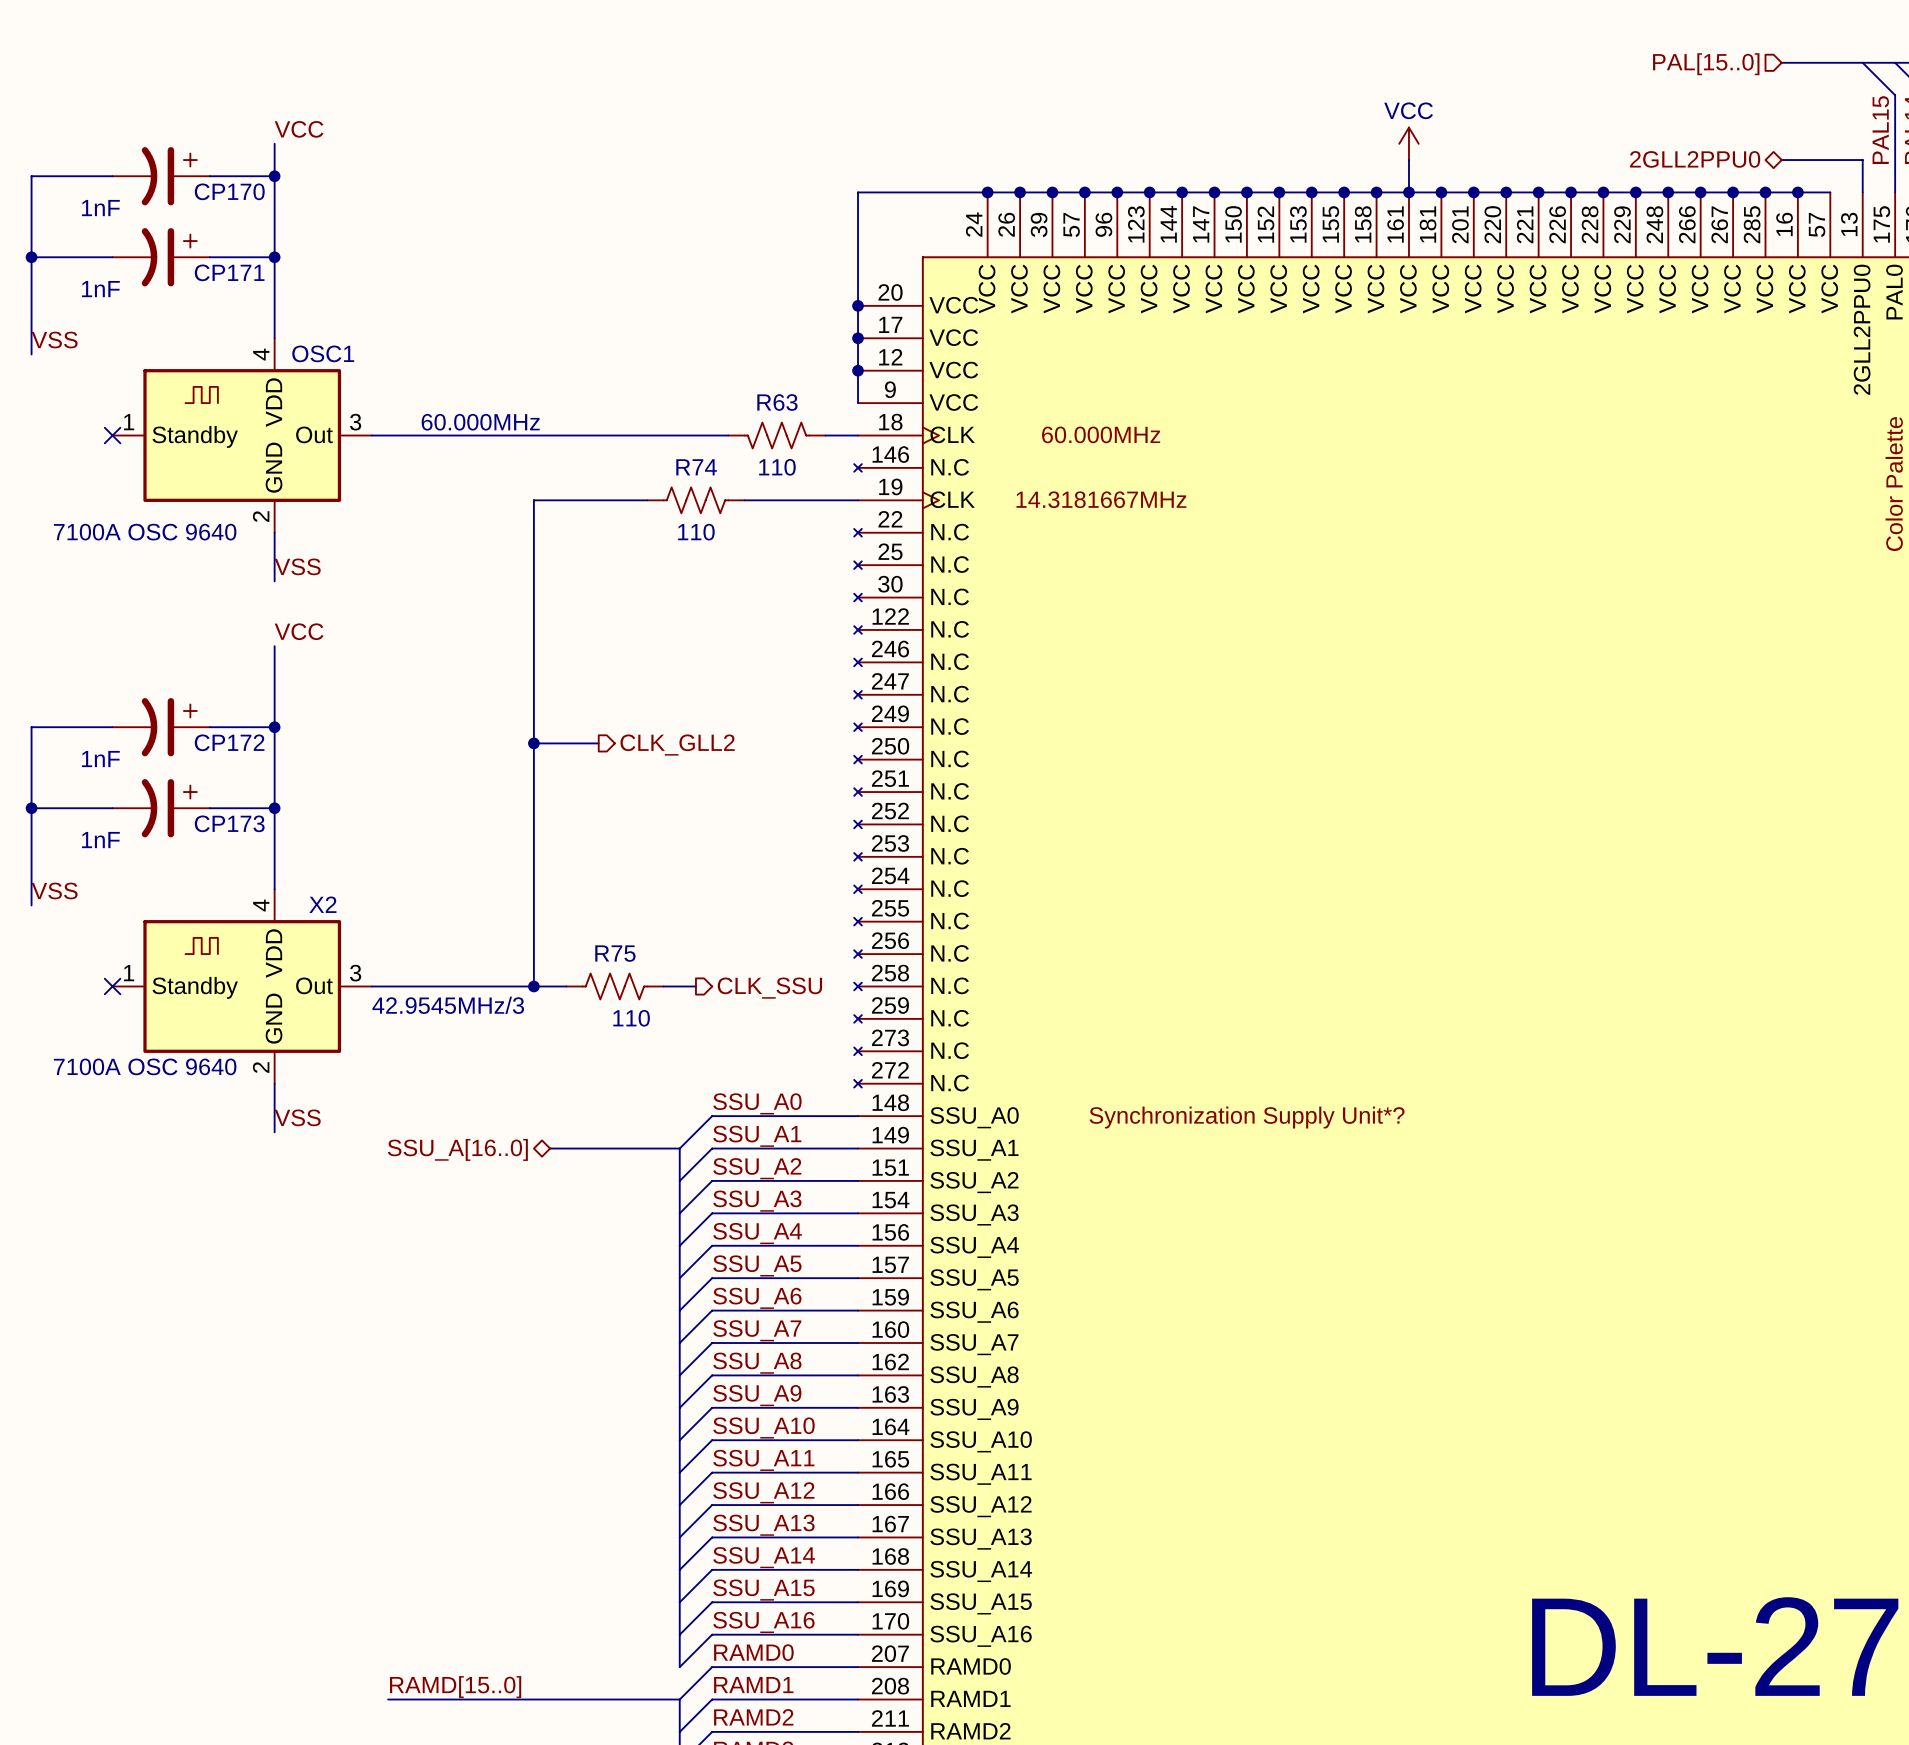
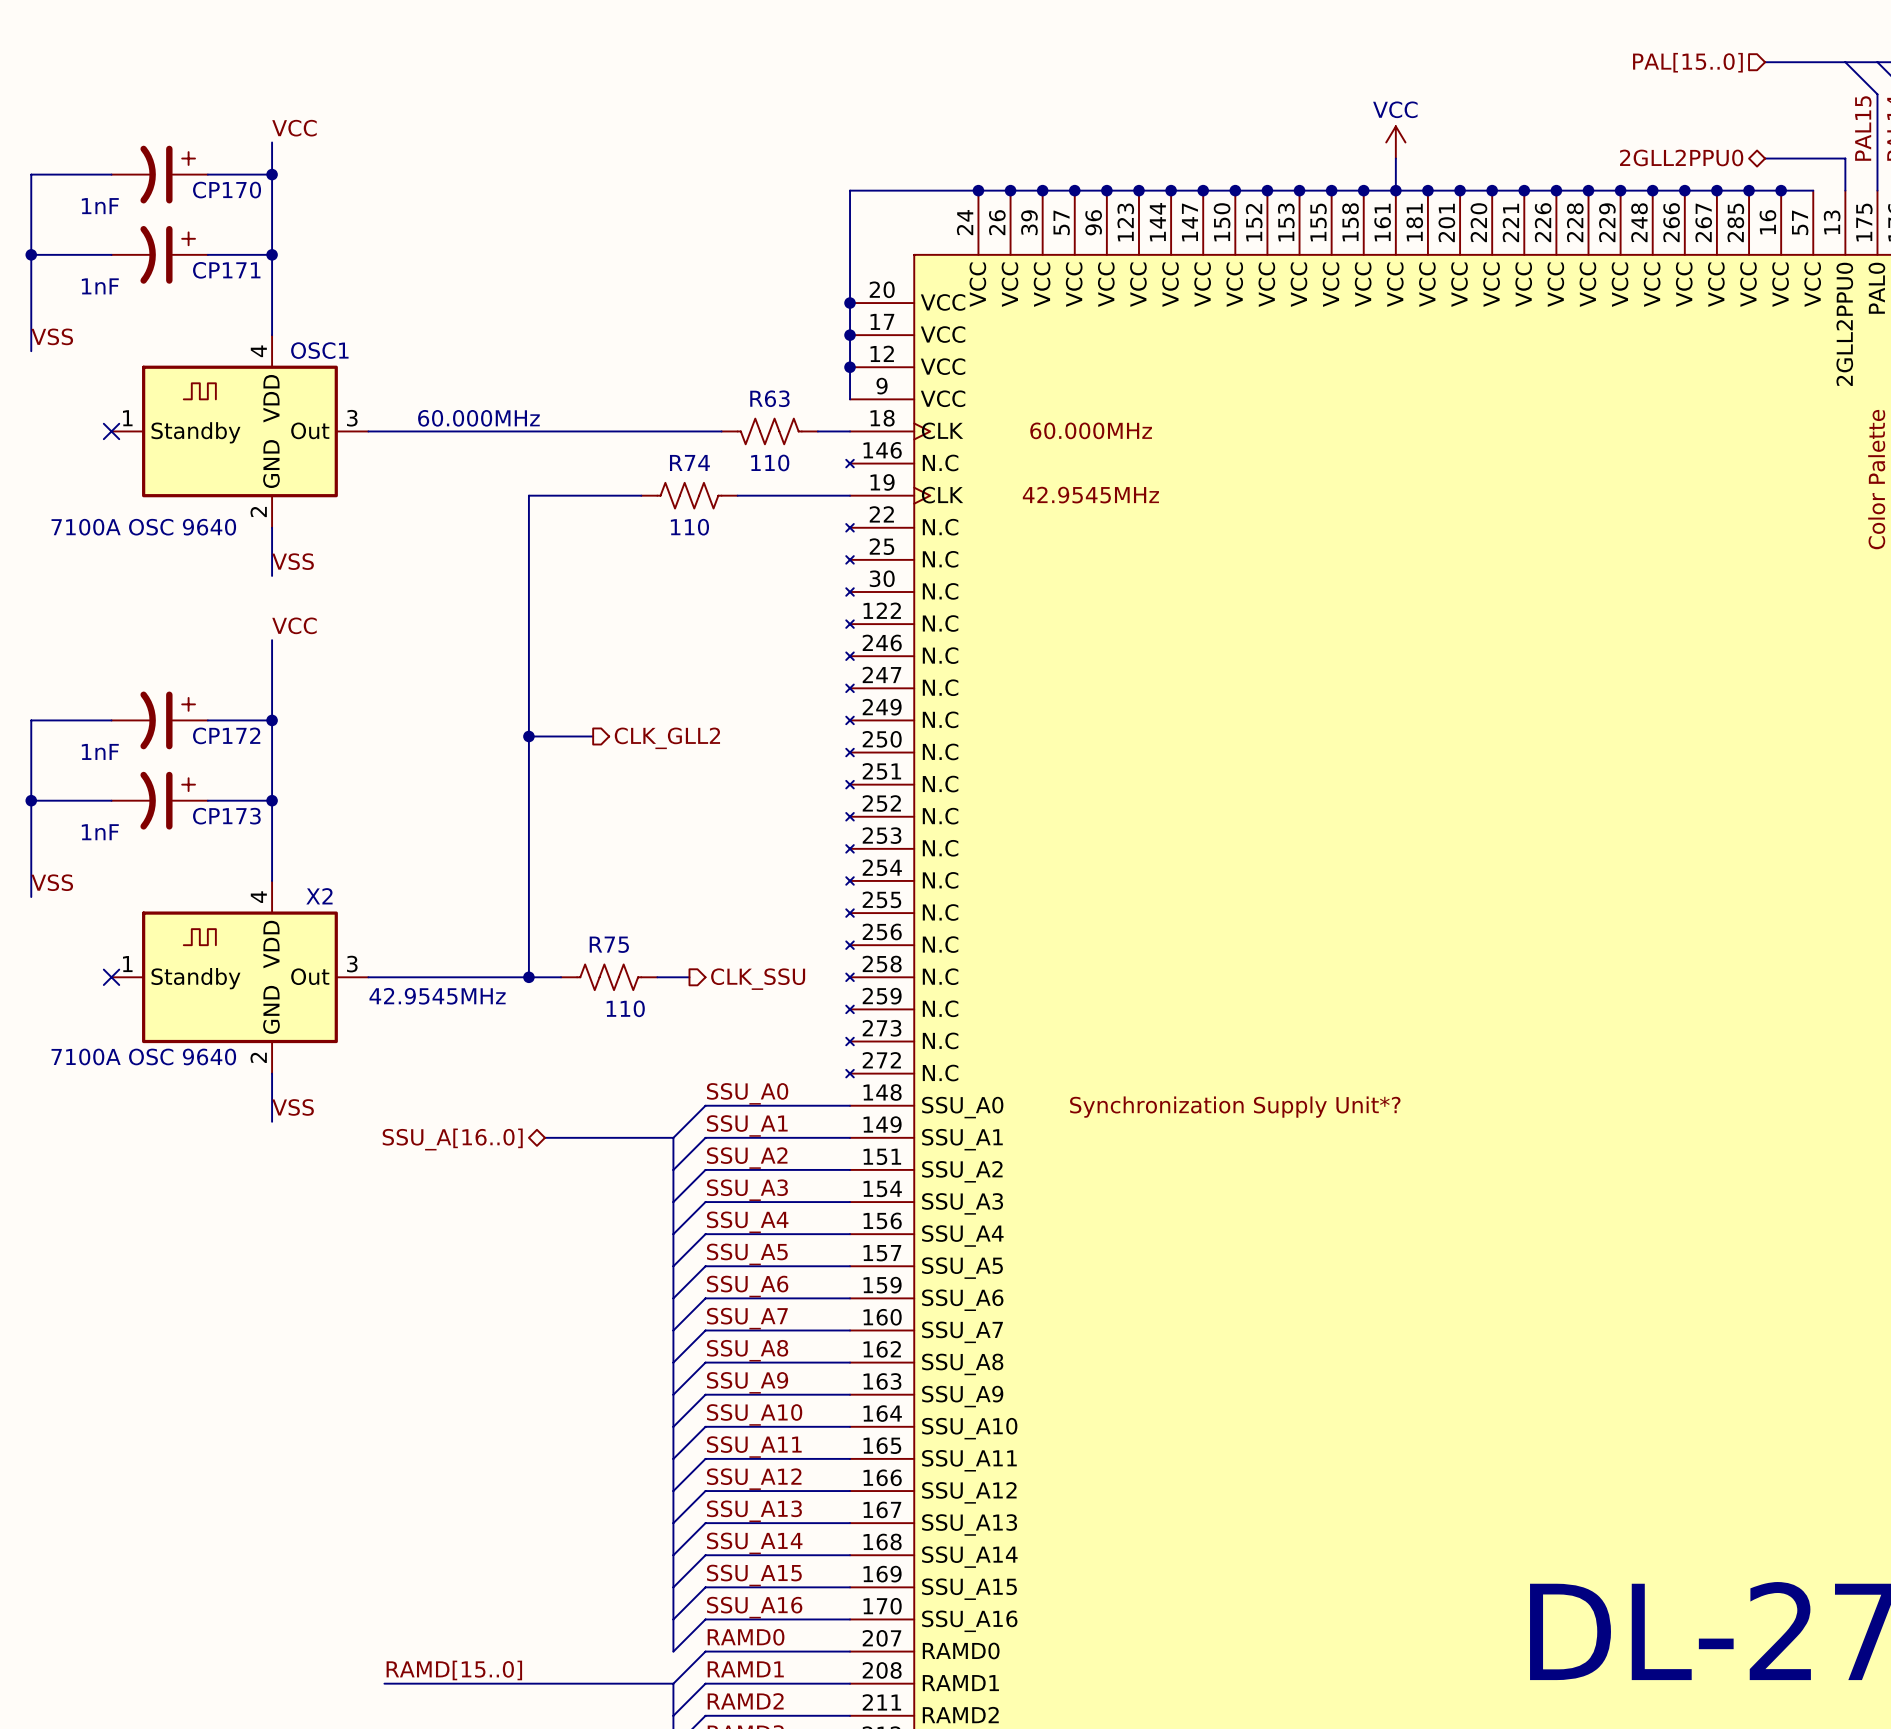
part text: 14.3181667MHz (1101, 499) -> 42.9545MHz (1090, 495)
text: 42.9545MHz/3 (448, 1005) -> 42.9545MHz (437, 996)

